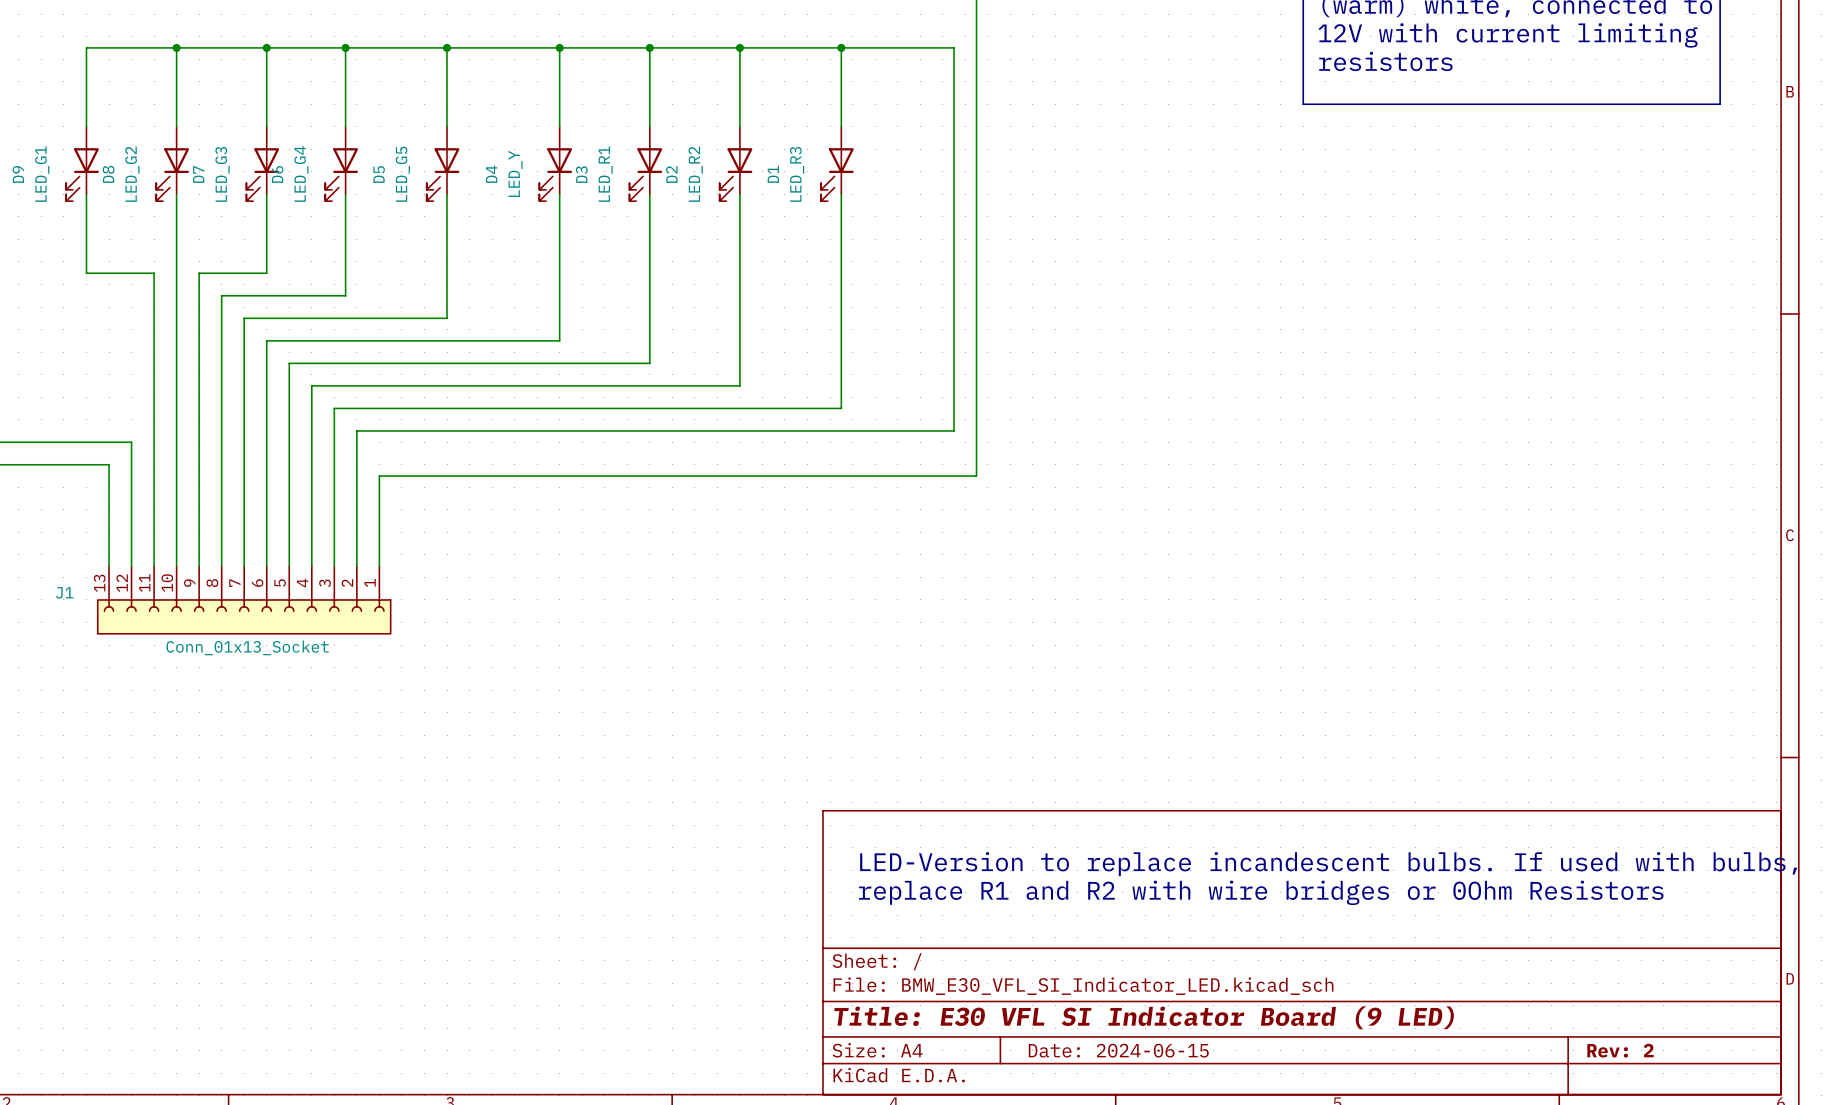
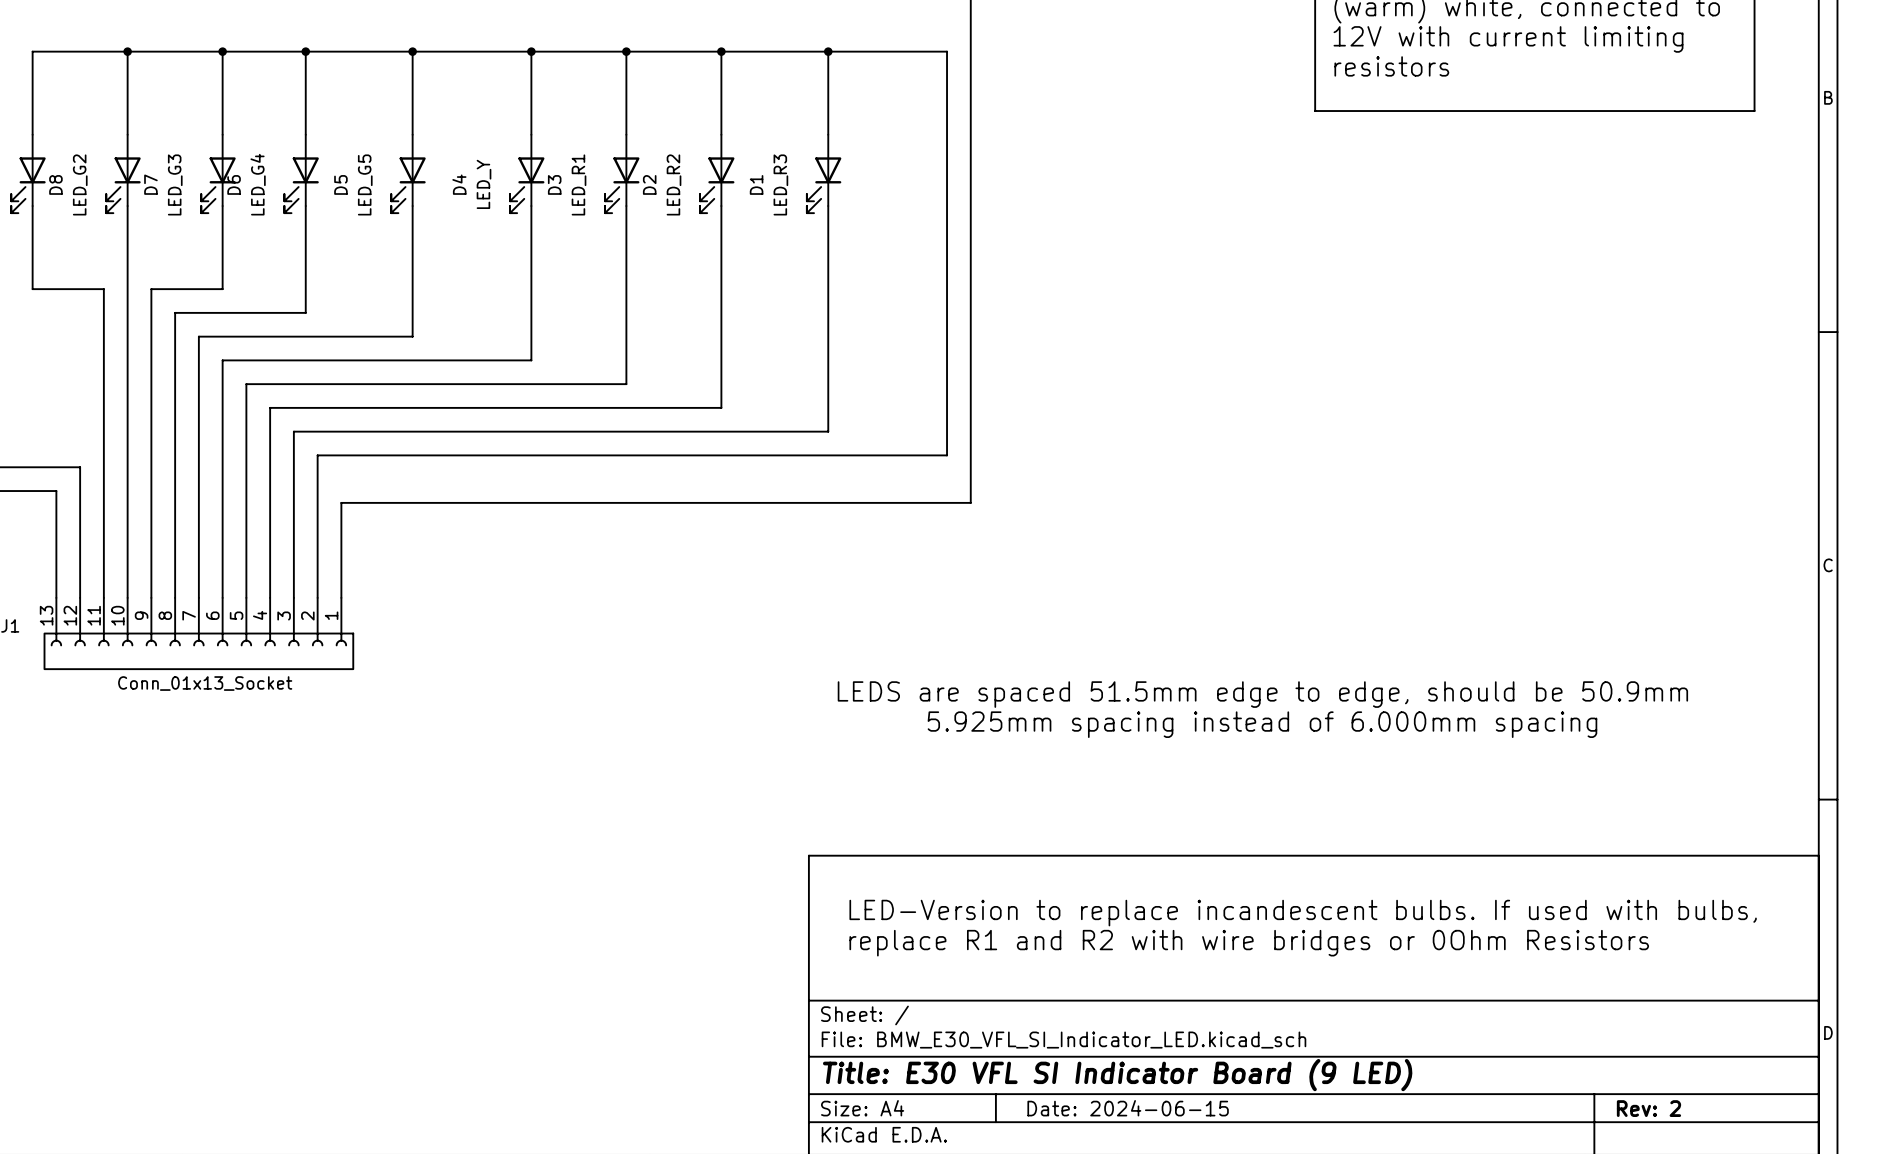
text: none -> LEDS are spaced 51.5mm edge to edge, should be 50.9mm (1262, 694)
text: none -> 5.925mm spacing instead of 6.000mm spacing (1262, 724)

